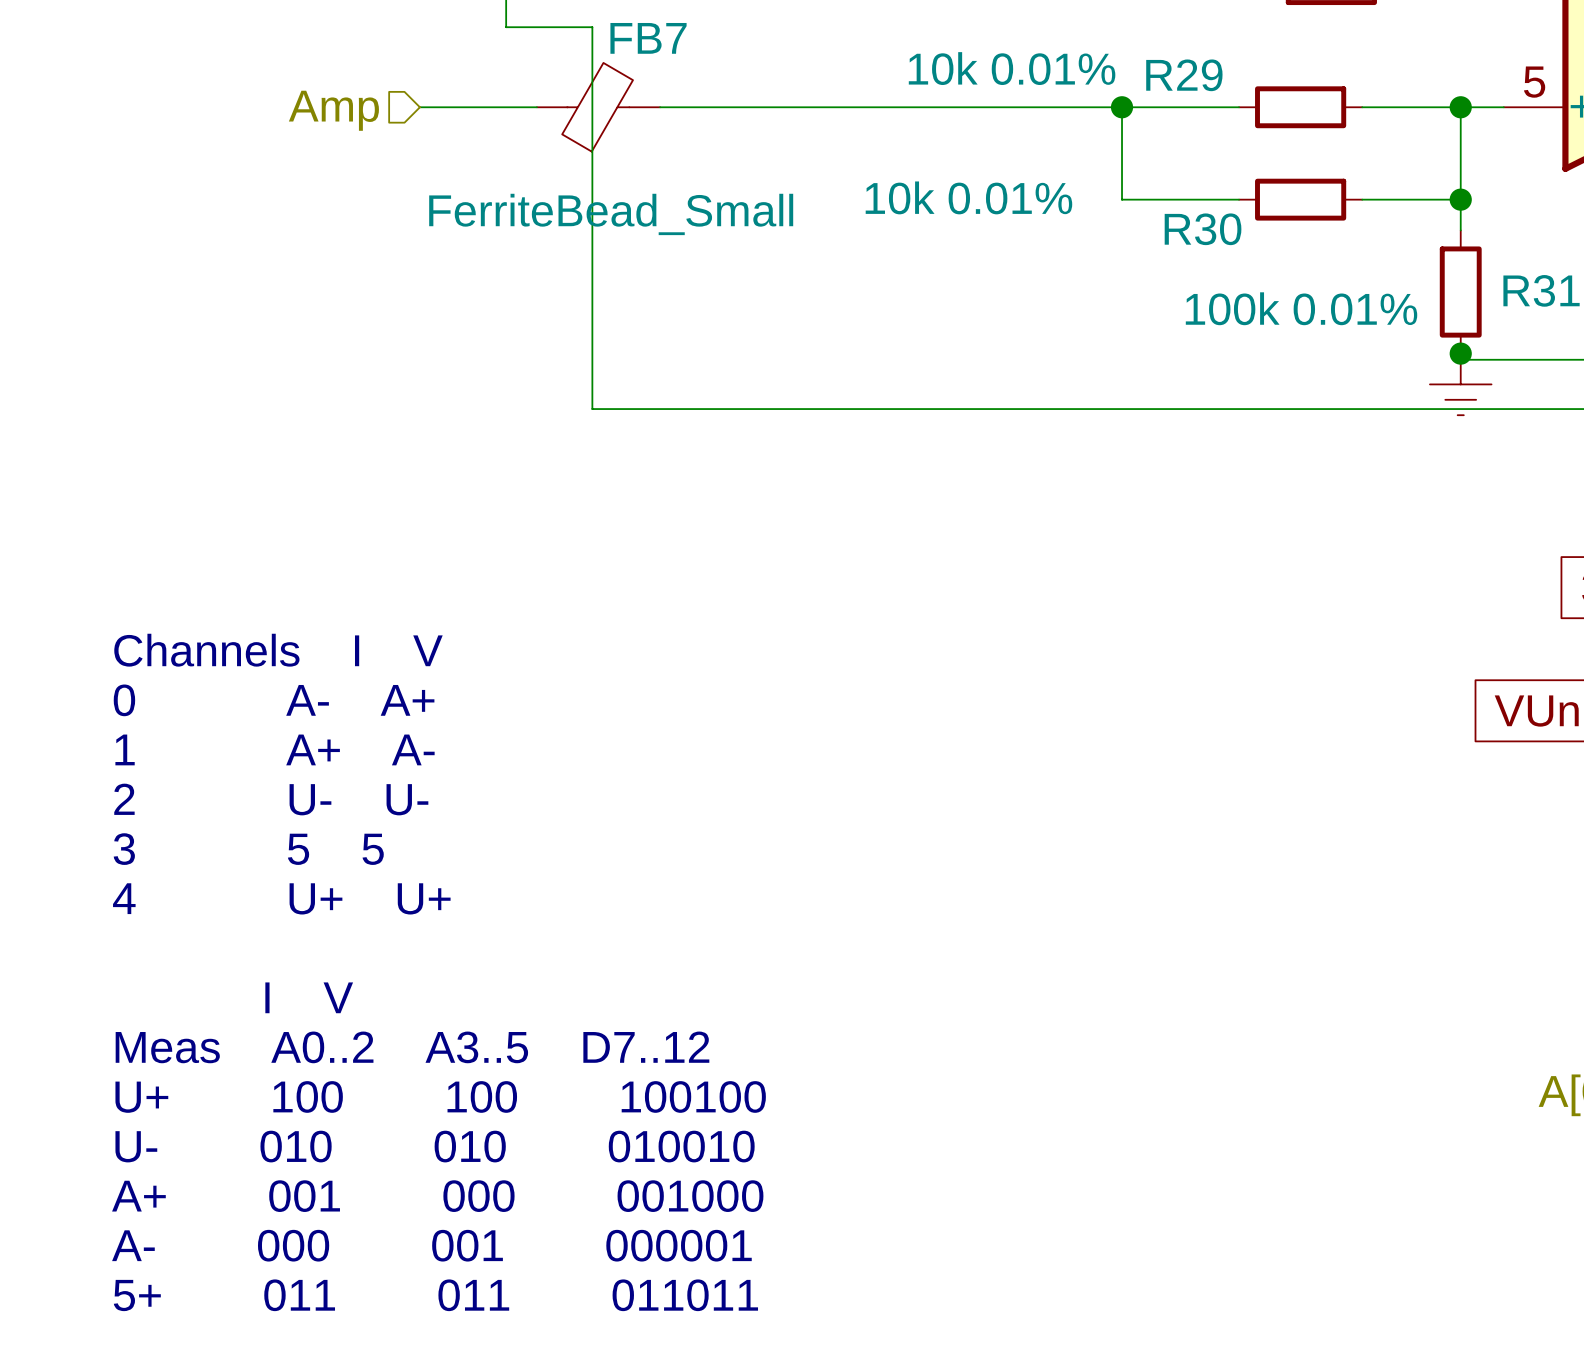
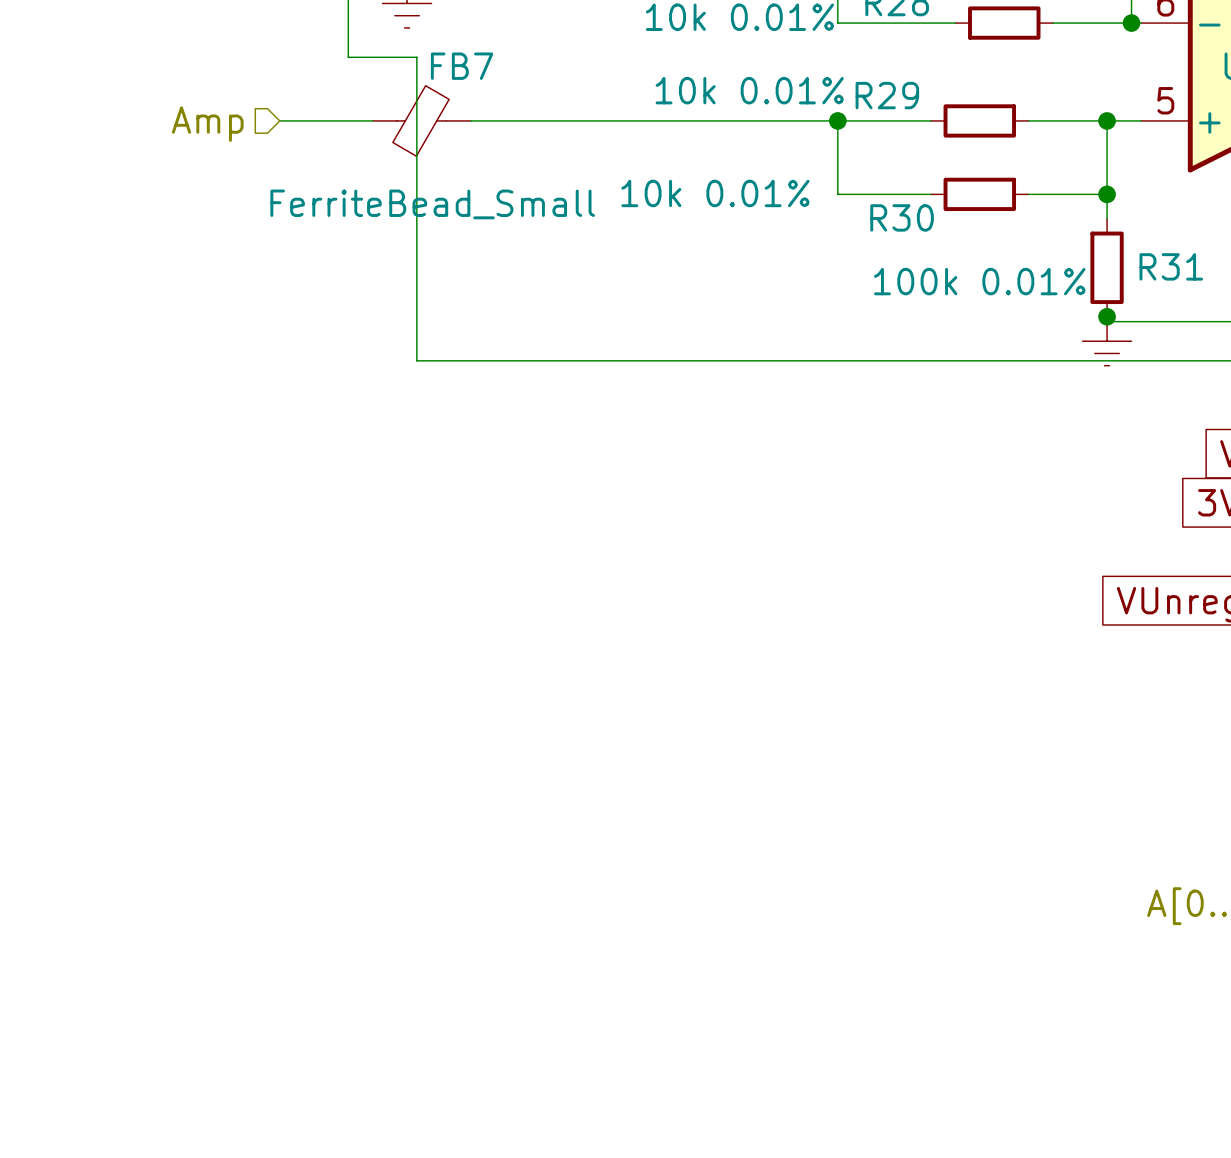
text: Channels I V (278, 650) -> none
text: 0 A- A+ (274, 700) -> none
text: 1 A+ A- (275, 749) -> none
text: 2 U- U- (271, 799) -> none
text: 3 5 5 (248, 849) -> none
text: 4 U+ U+ (281, 898) -> none
text: I V (309, 997) -> none
text: Meas A0..2 A3..5 D7..12 (412, 1047) -> none
text: U+ 100 100 100100 (440, 1096) -> none
text: U- 010 010 010010 (435, 1146) -> none
text: A+ 001 000 001000 (437, 1196) -> none
text: A- 000 001 000001 (431, 1245) -> none
text: 5+ 011 011 011011 (435, 1295) -> none

